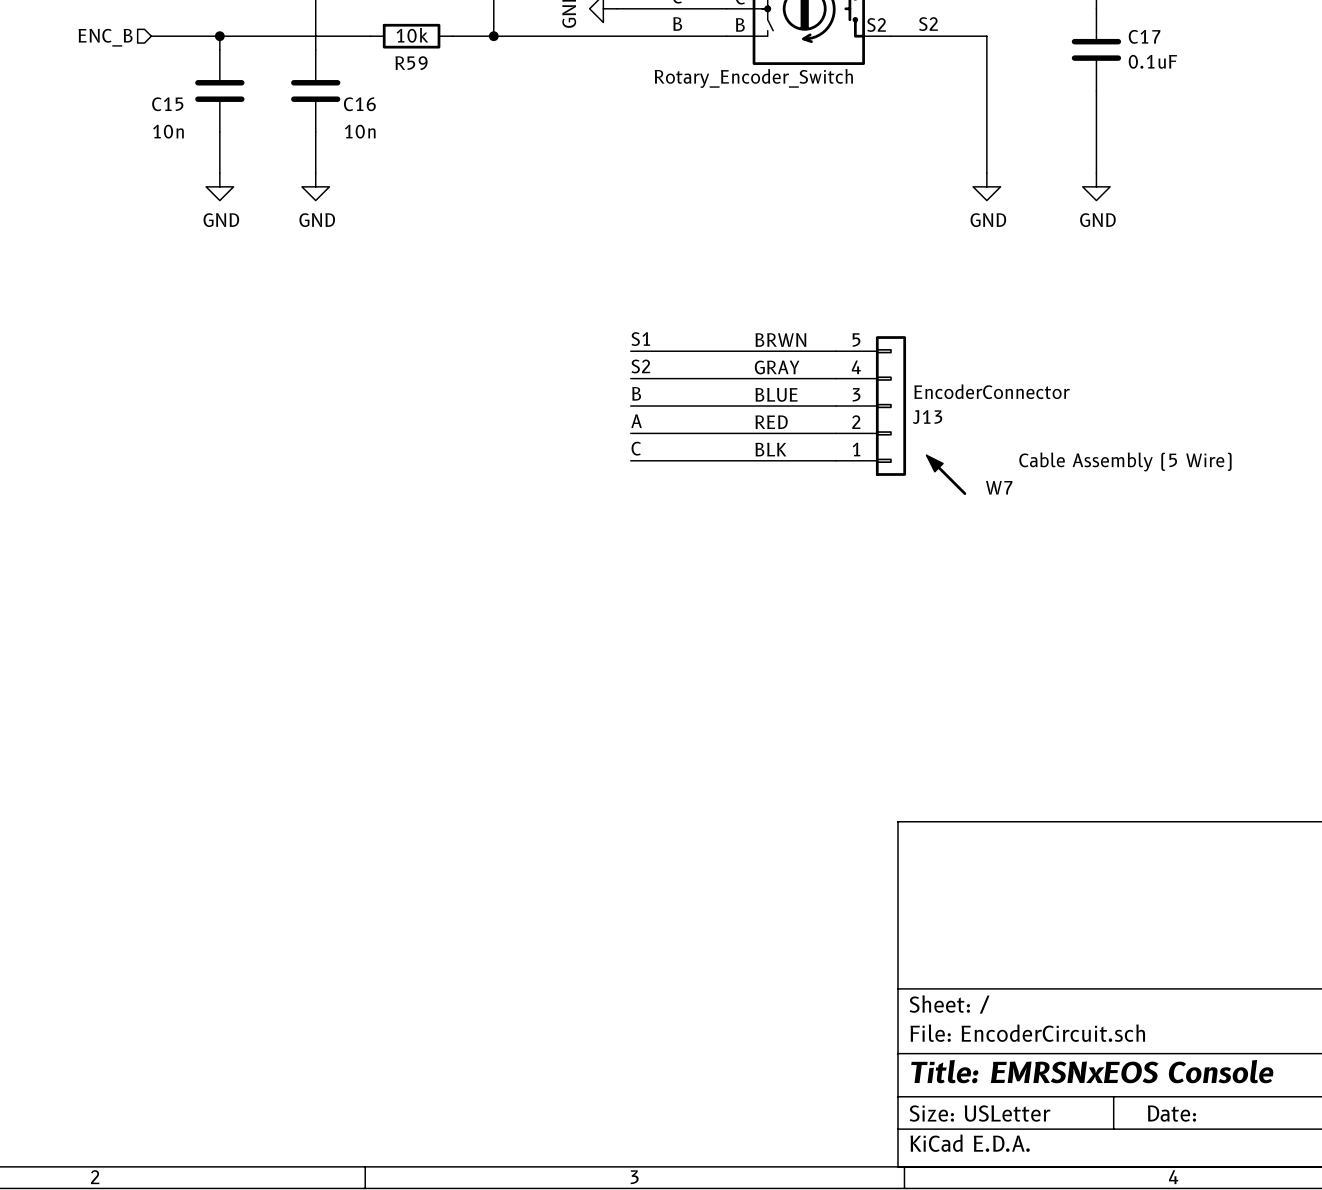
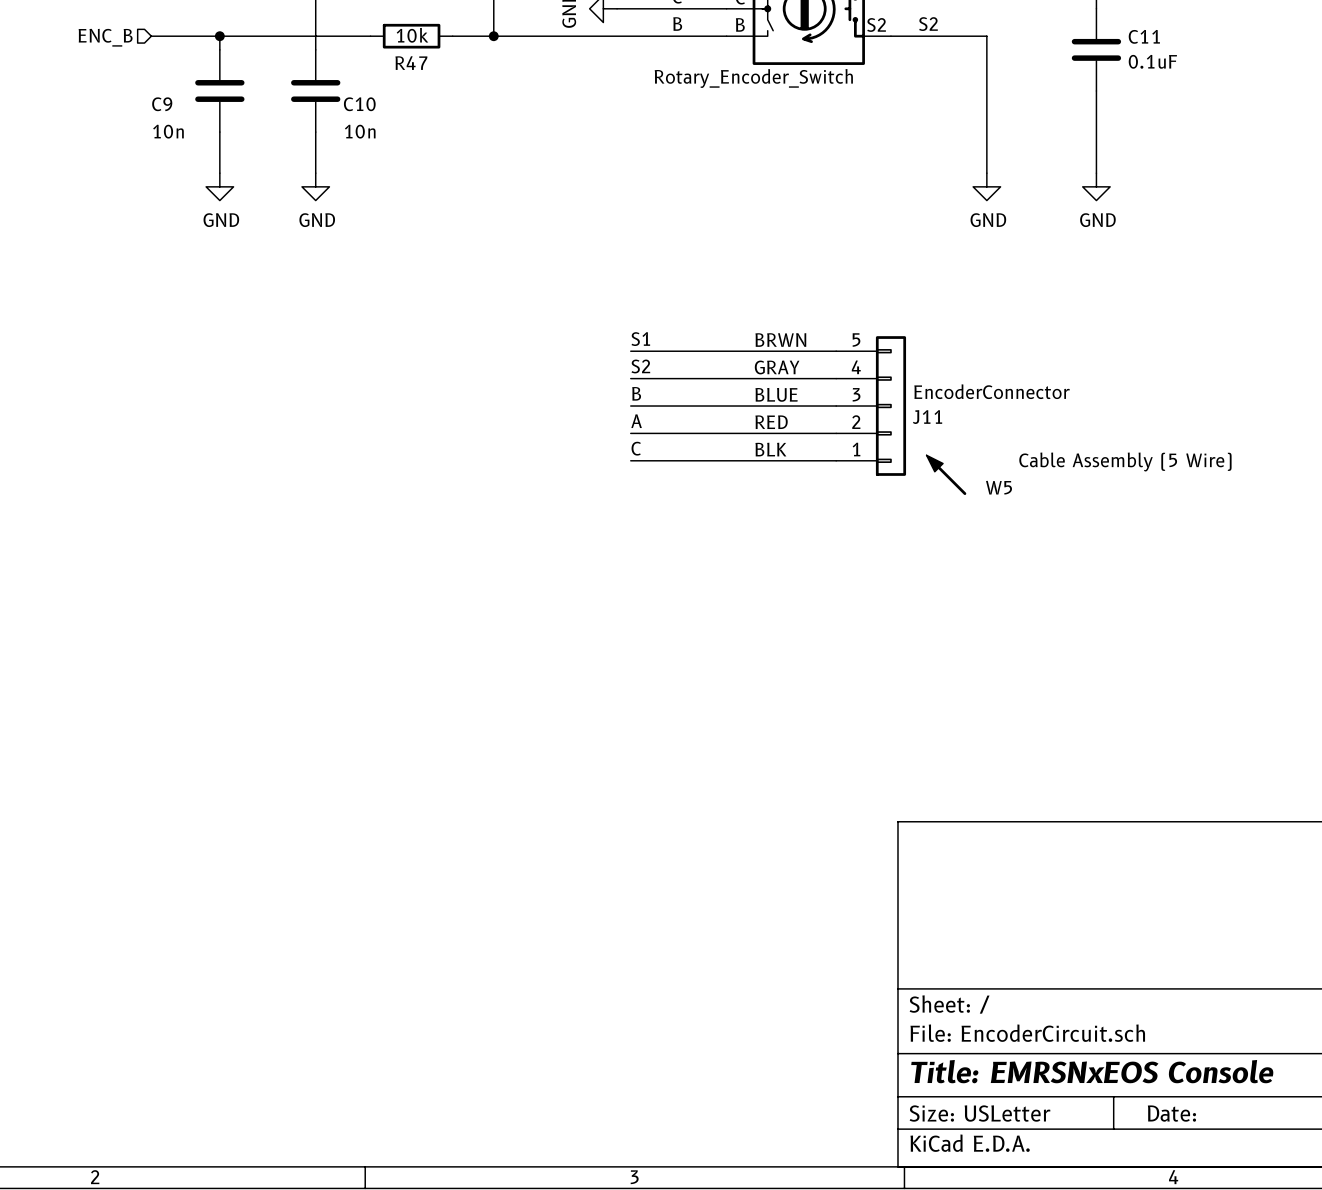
C17 name: C17 (1144, 36) -> C11 (1144, 36)
R59 name: R59 (411, 63) -> R47 (411, 63)
C15 name: C15 (167, 104) -> C9 (162, 104)
C16 name: C16 (359, 104) -> C10 (359, 104)
J13 name: J13 (927, 417) -> J11 (927, 417)
W7 name: W7 (999, 487) -> W5 (999, 487)

